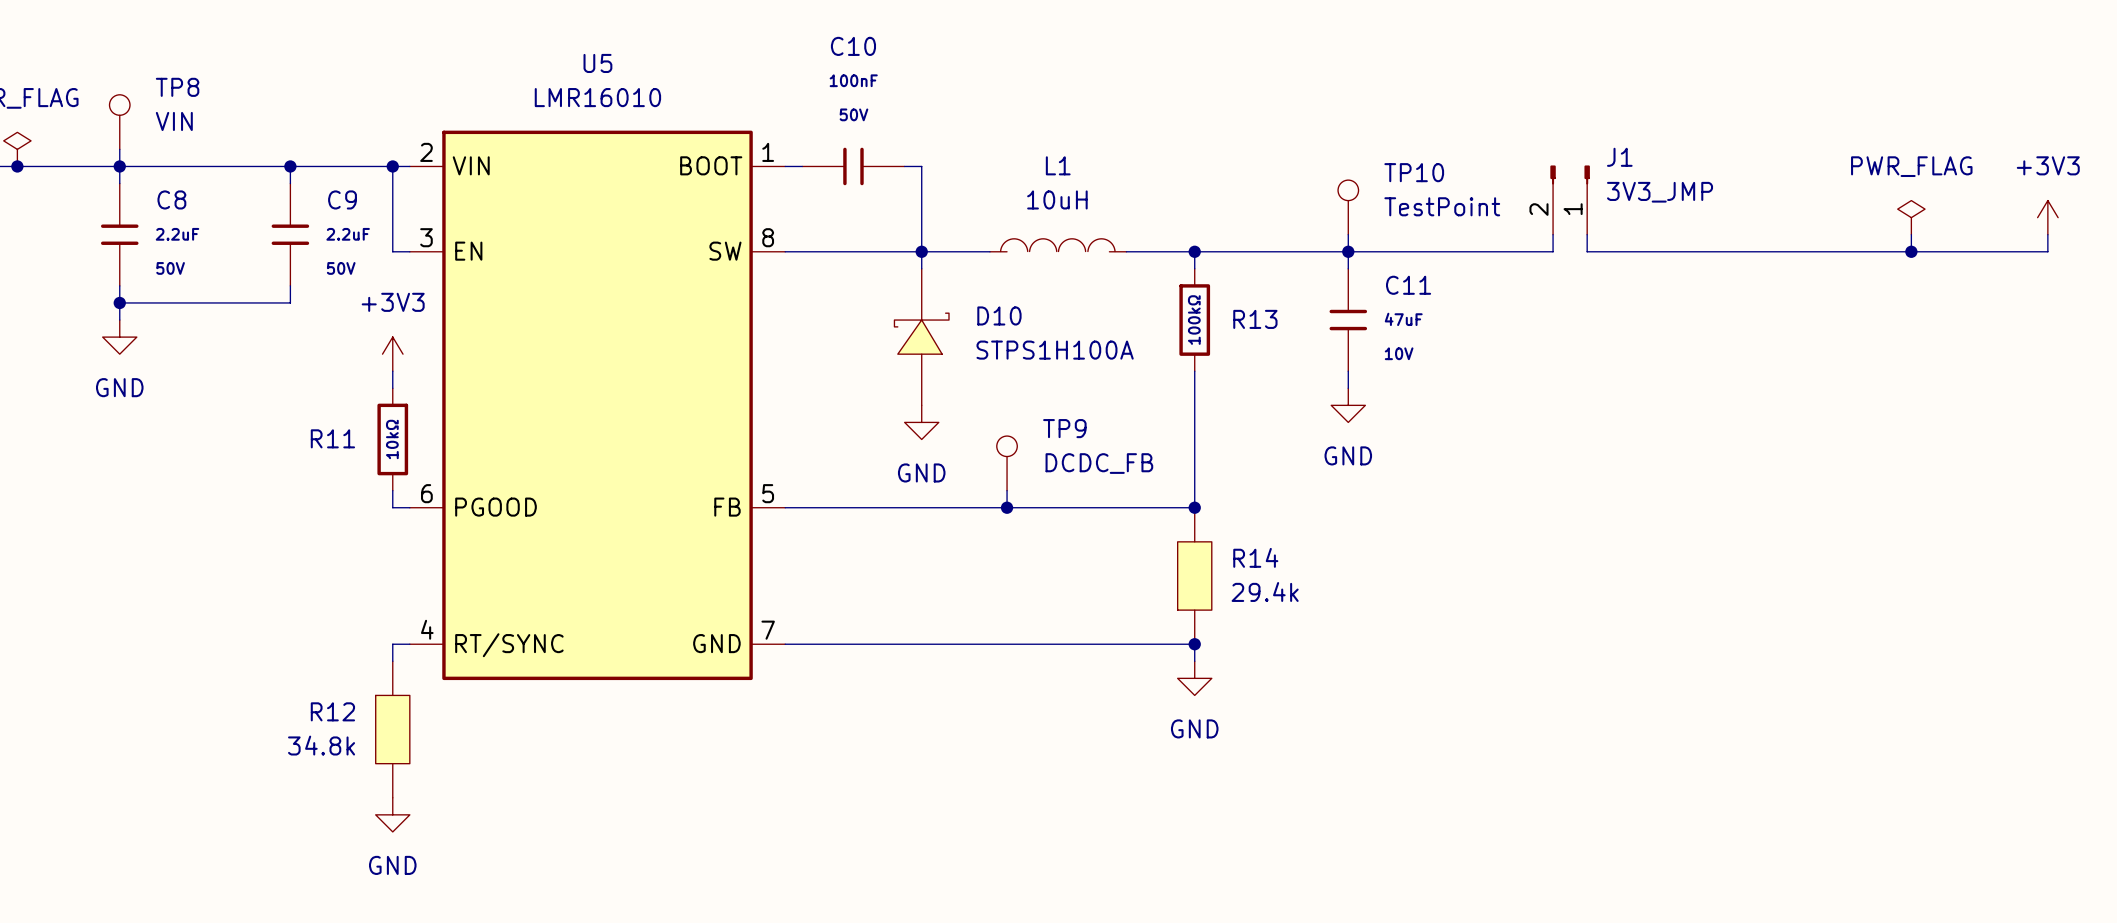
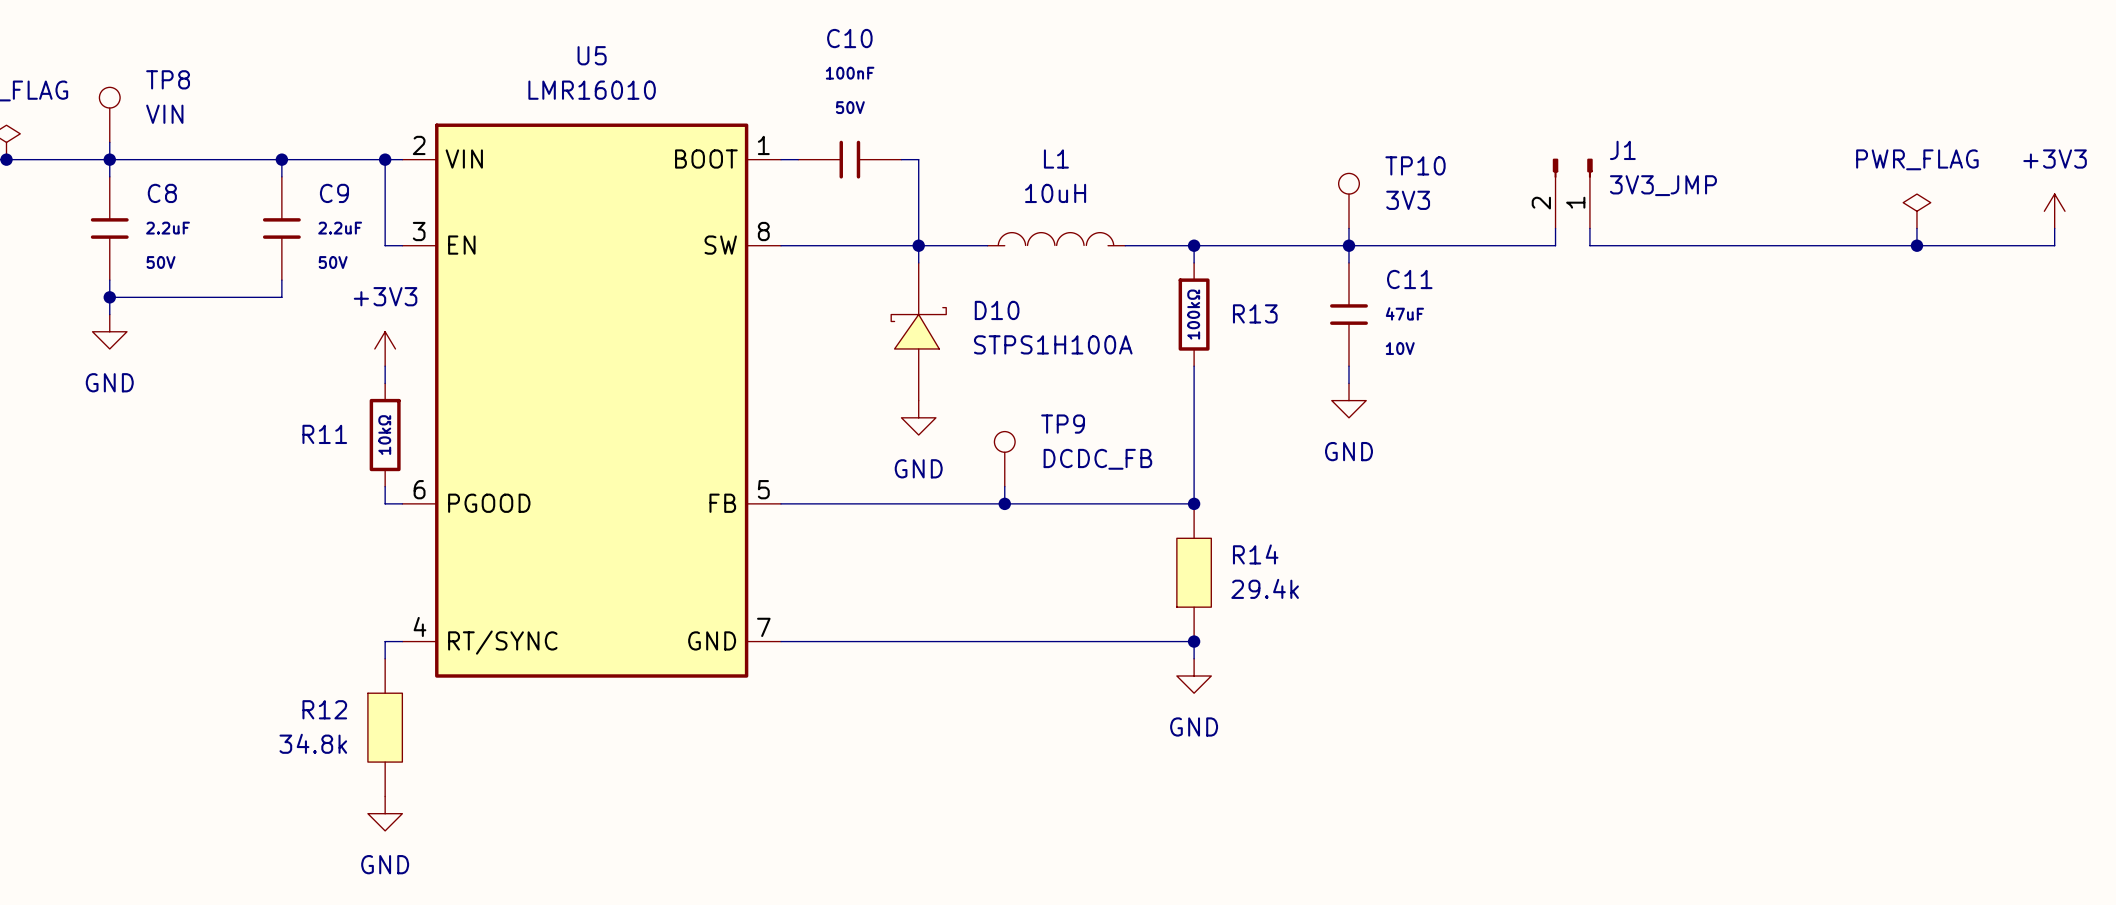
TP10 value: TestPoint (1442, 206) -> 3V3 (1408, 200)

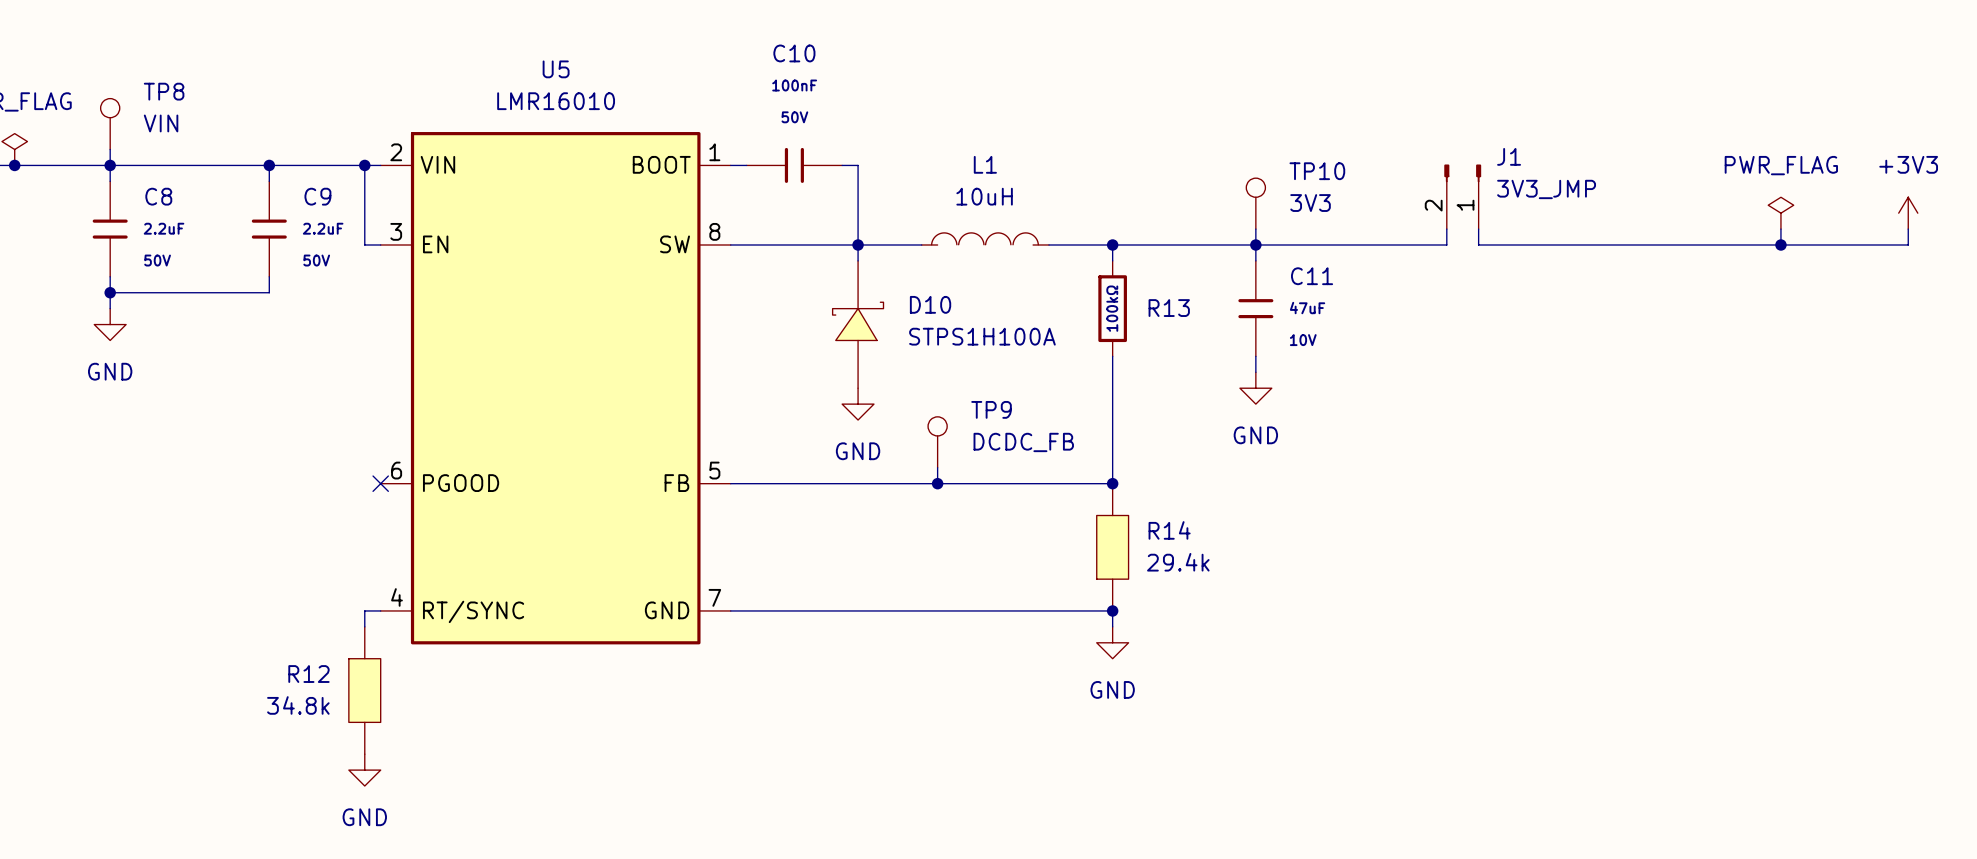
power symbol: +3V3 (385, 348) -> none
wire: (385, 366) (385, 383) -> none
R11: 10kΩ (385, 435) -> none
wire: (385, 486) (385, 503) (402, 503) -> none
no-connect mark: none -> (380, 483)

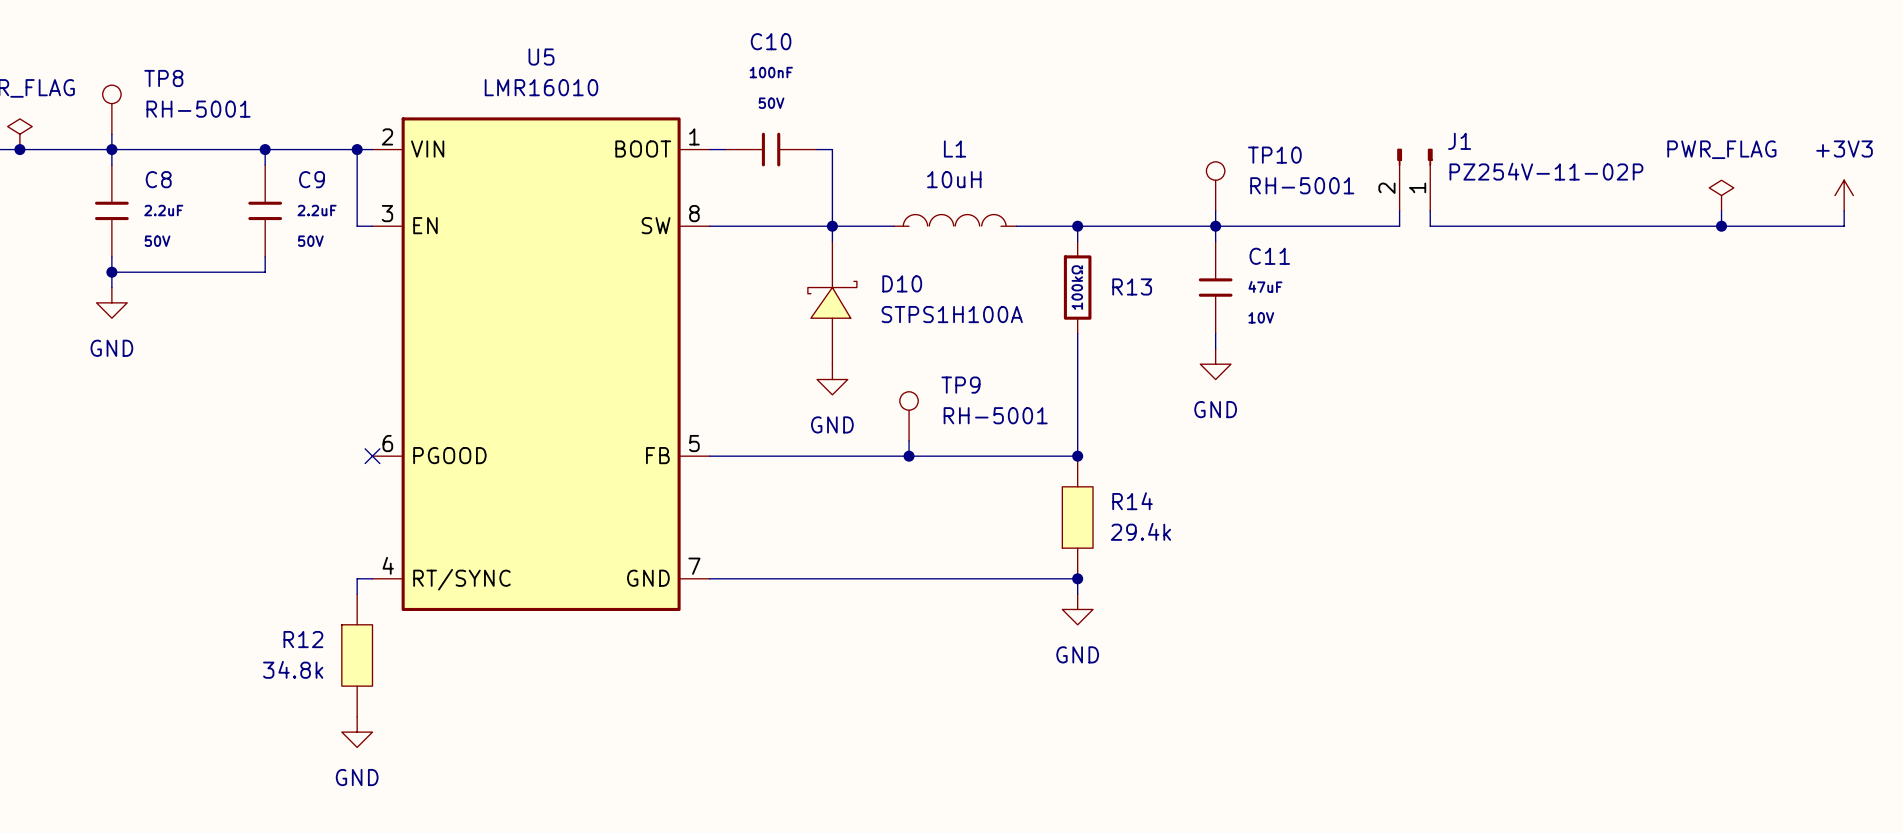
TP8 value: VIN (161, 123) -> RH-5001 (198, 109)
J1 value: 3V3_JMP (1546, 189) -> PZ254V-11-02P (1546, 171)
TP10 value: 3V3 (1310, 203) -> RH-5001 (1302, 185)
TP9 value: DCDC_FB (1023, 442) -> RH-5001 (995, 415)

